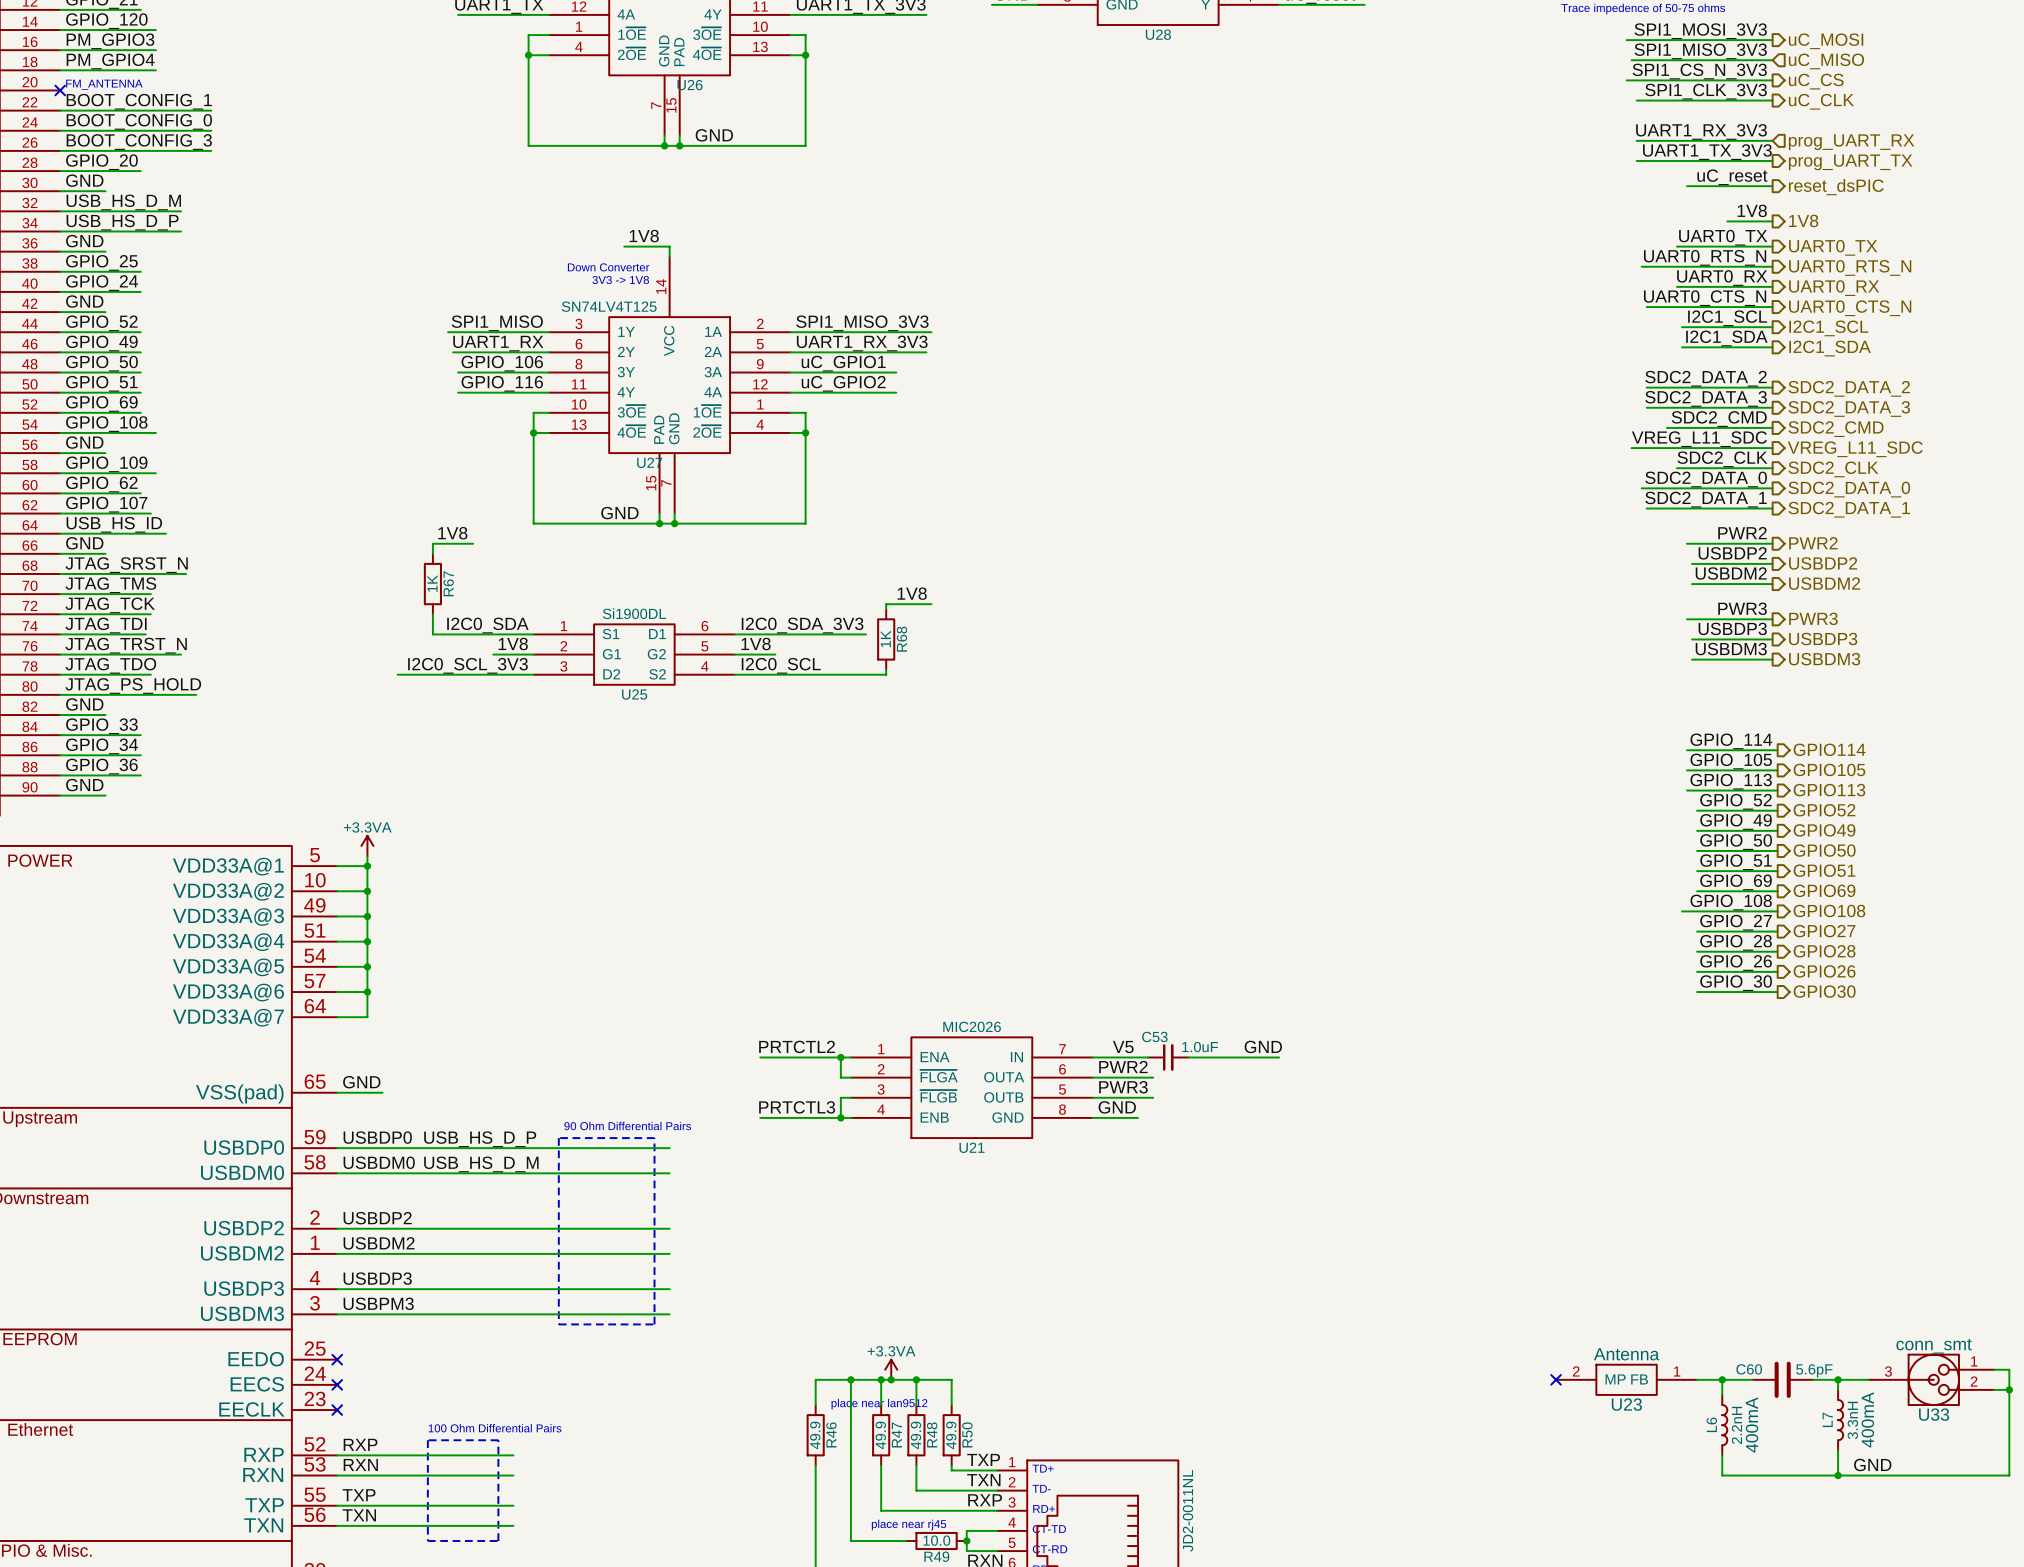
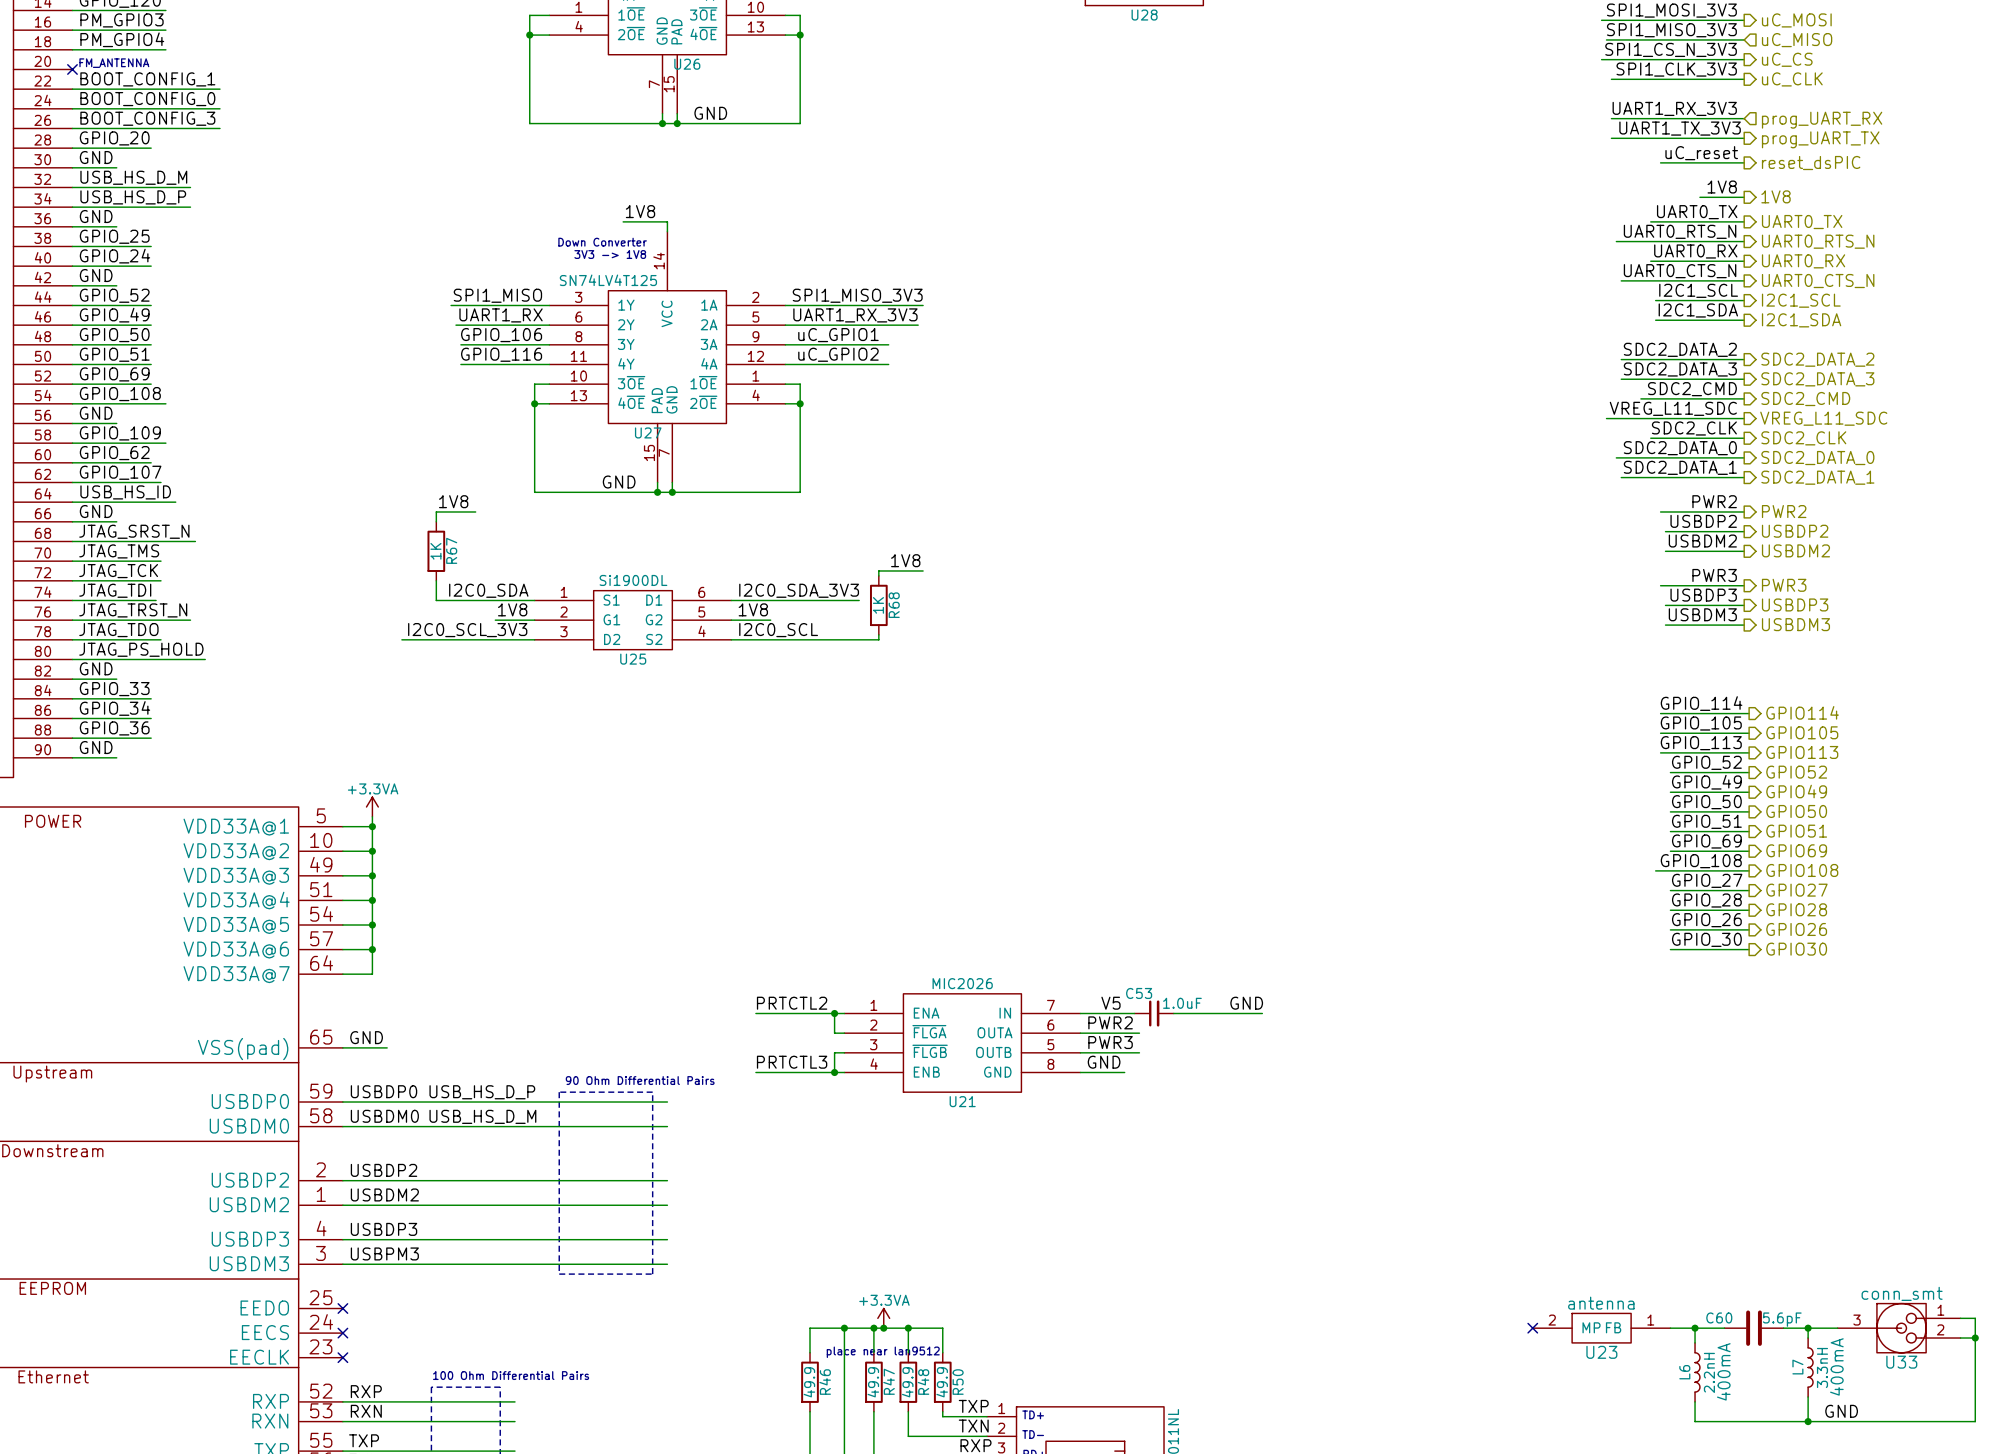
U23 value: Antenna (1626, 1354) -> antenna (1601, 1303)

